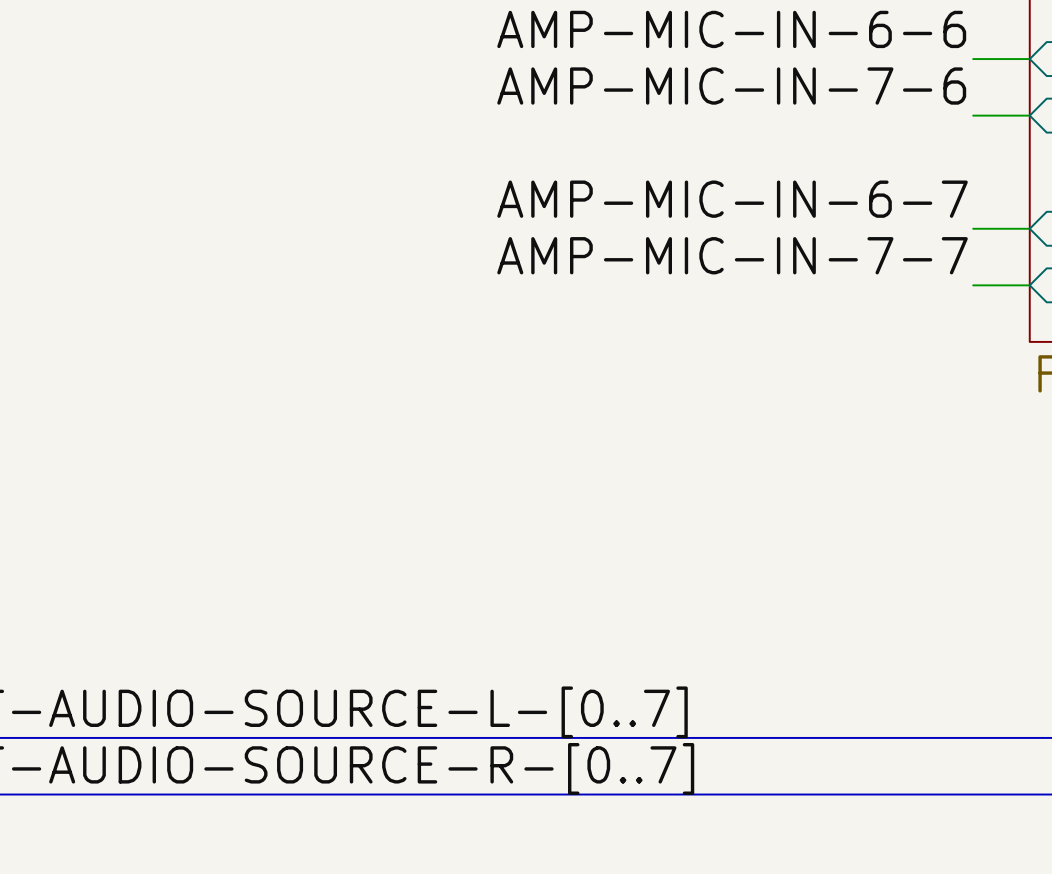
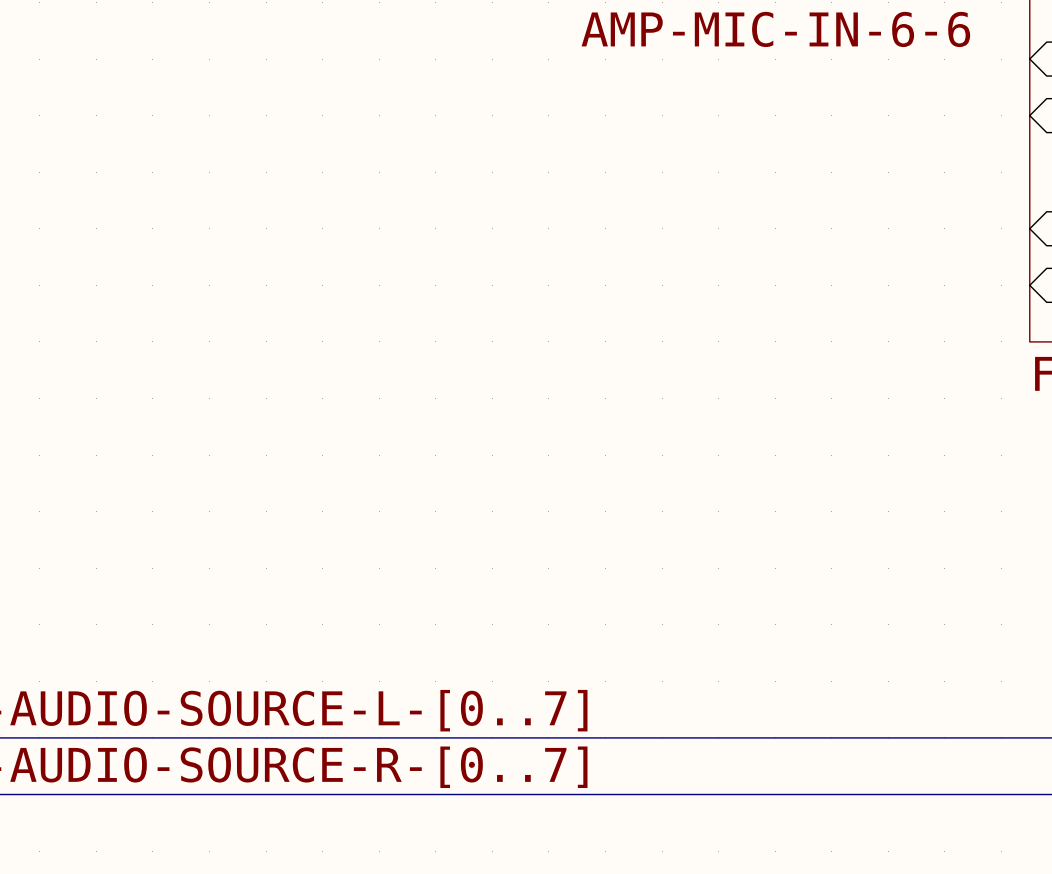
wire: (973, 59) (1029, 59) -> none
label: AMP-MIC-IN-7-6 (731, 86) -> none
wire: (973, 115) (1029, 115) -> none
label: AMP-MIC-IN-6-7 (732, 199) -> none
wire: (973, 228) (1029, 228) -> none
label: AMP-MIC-IN-7-7 (732, 255) -> none
wire: (973, 285) (1029, 285) -> none

